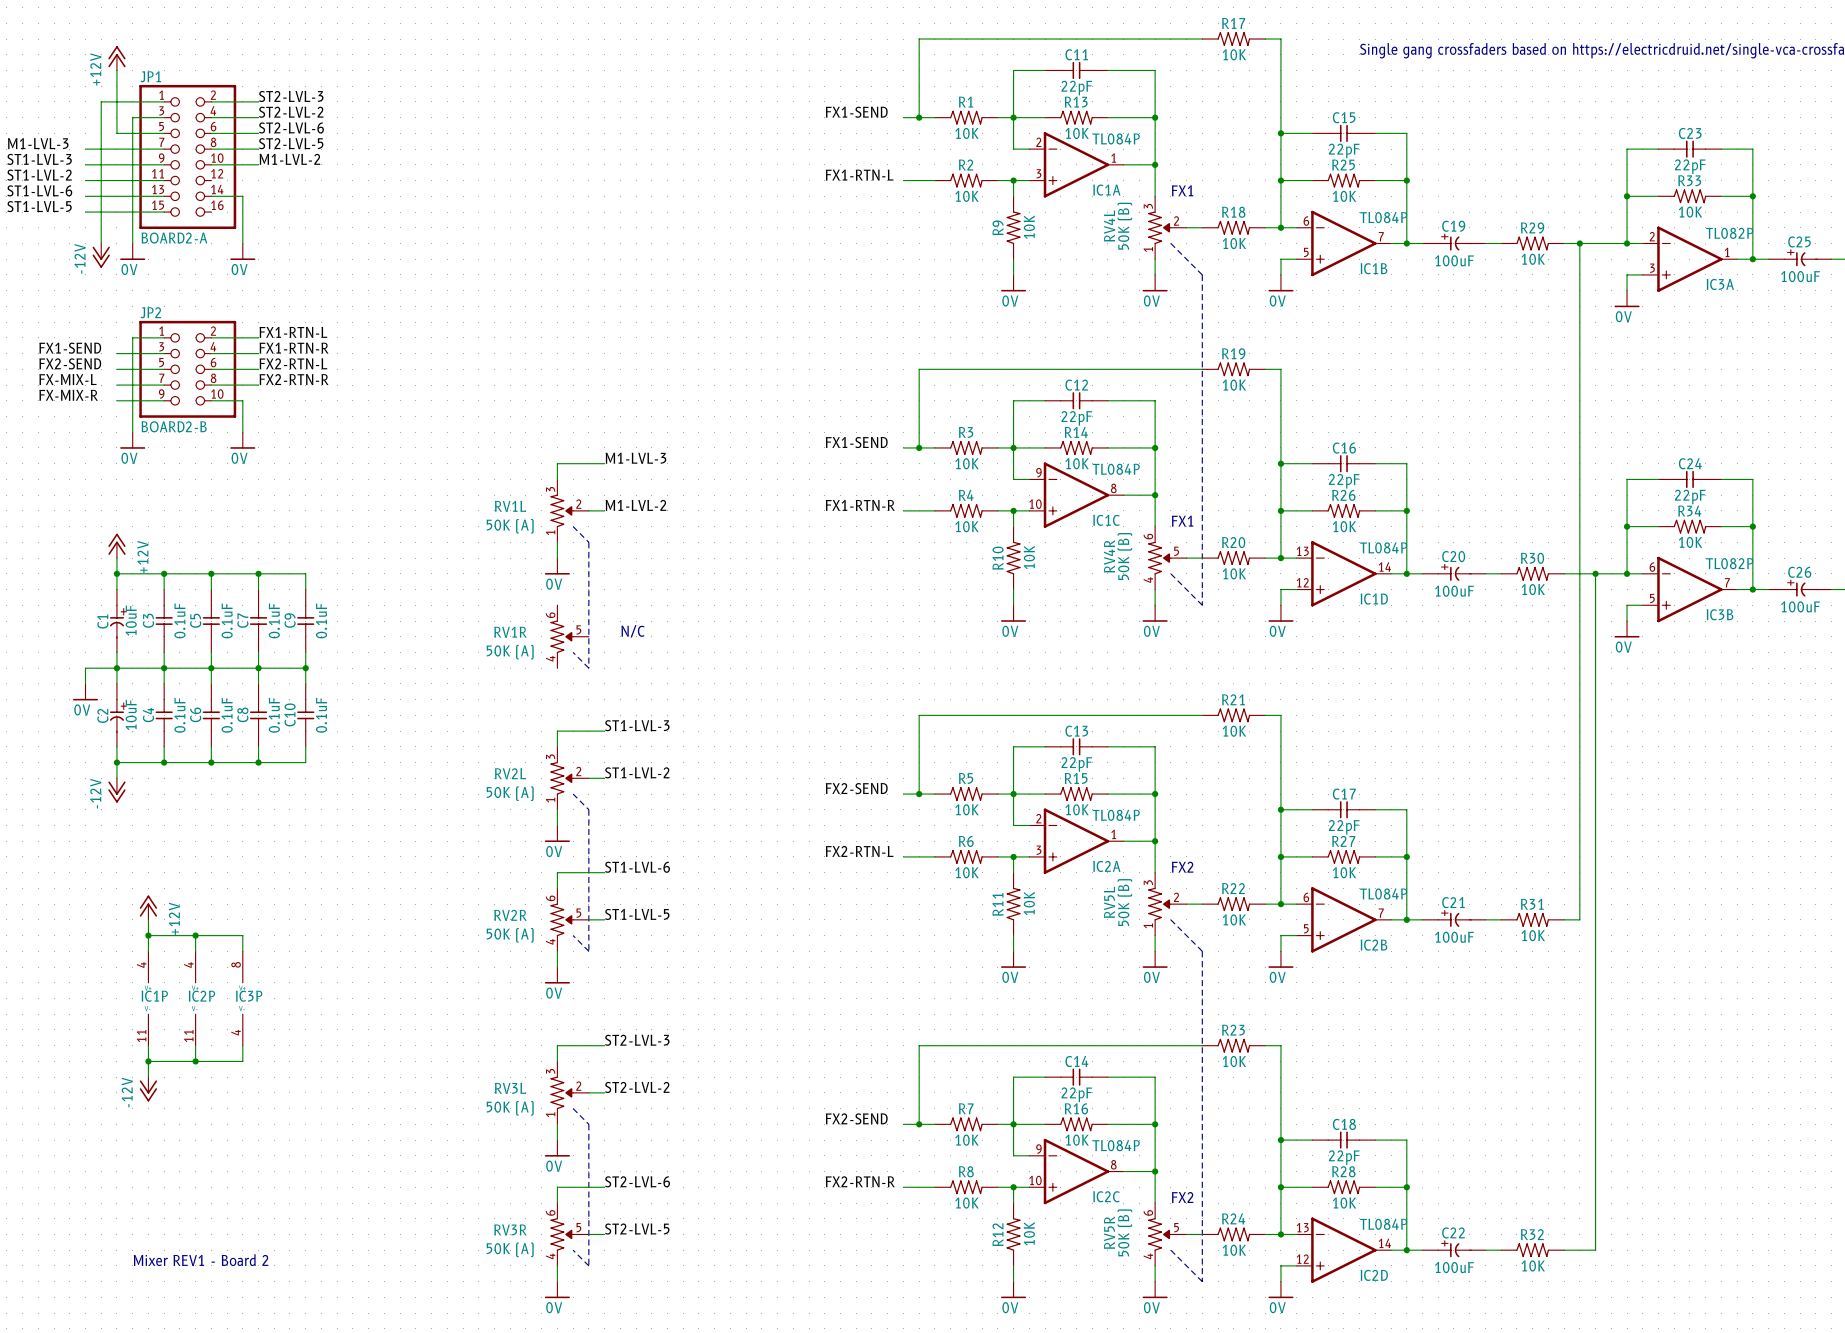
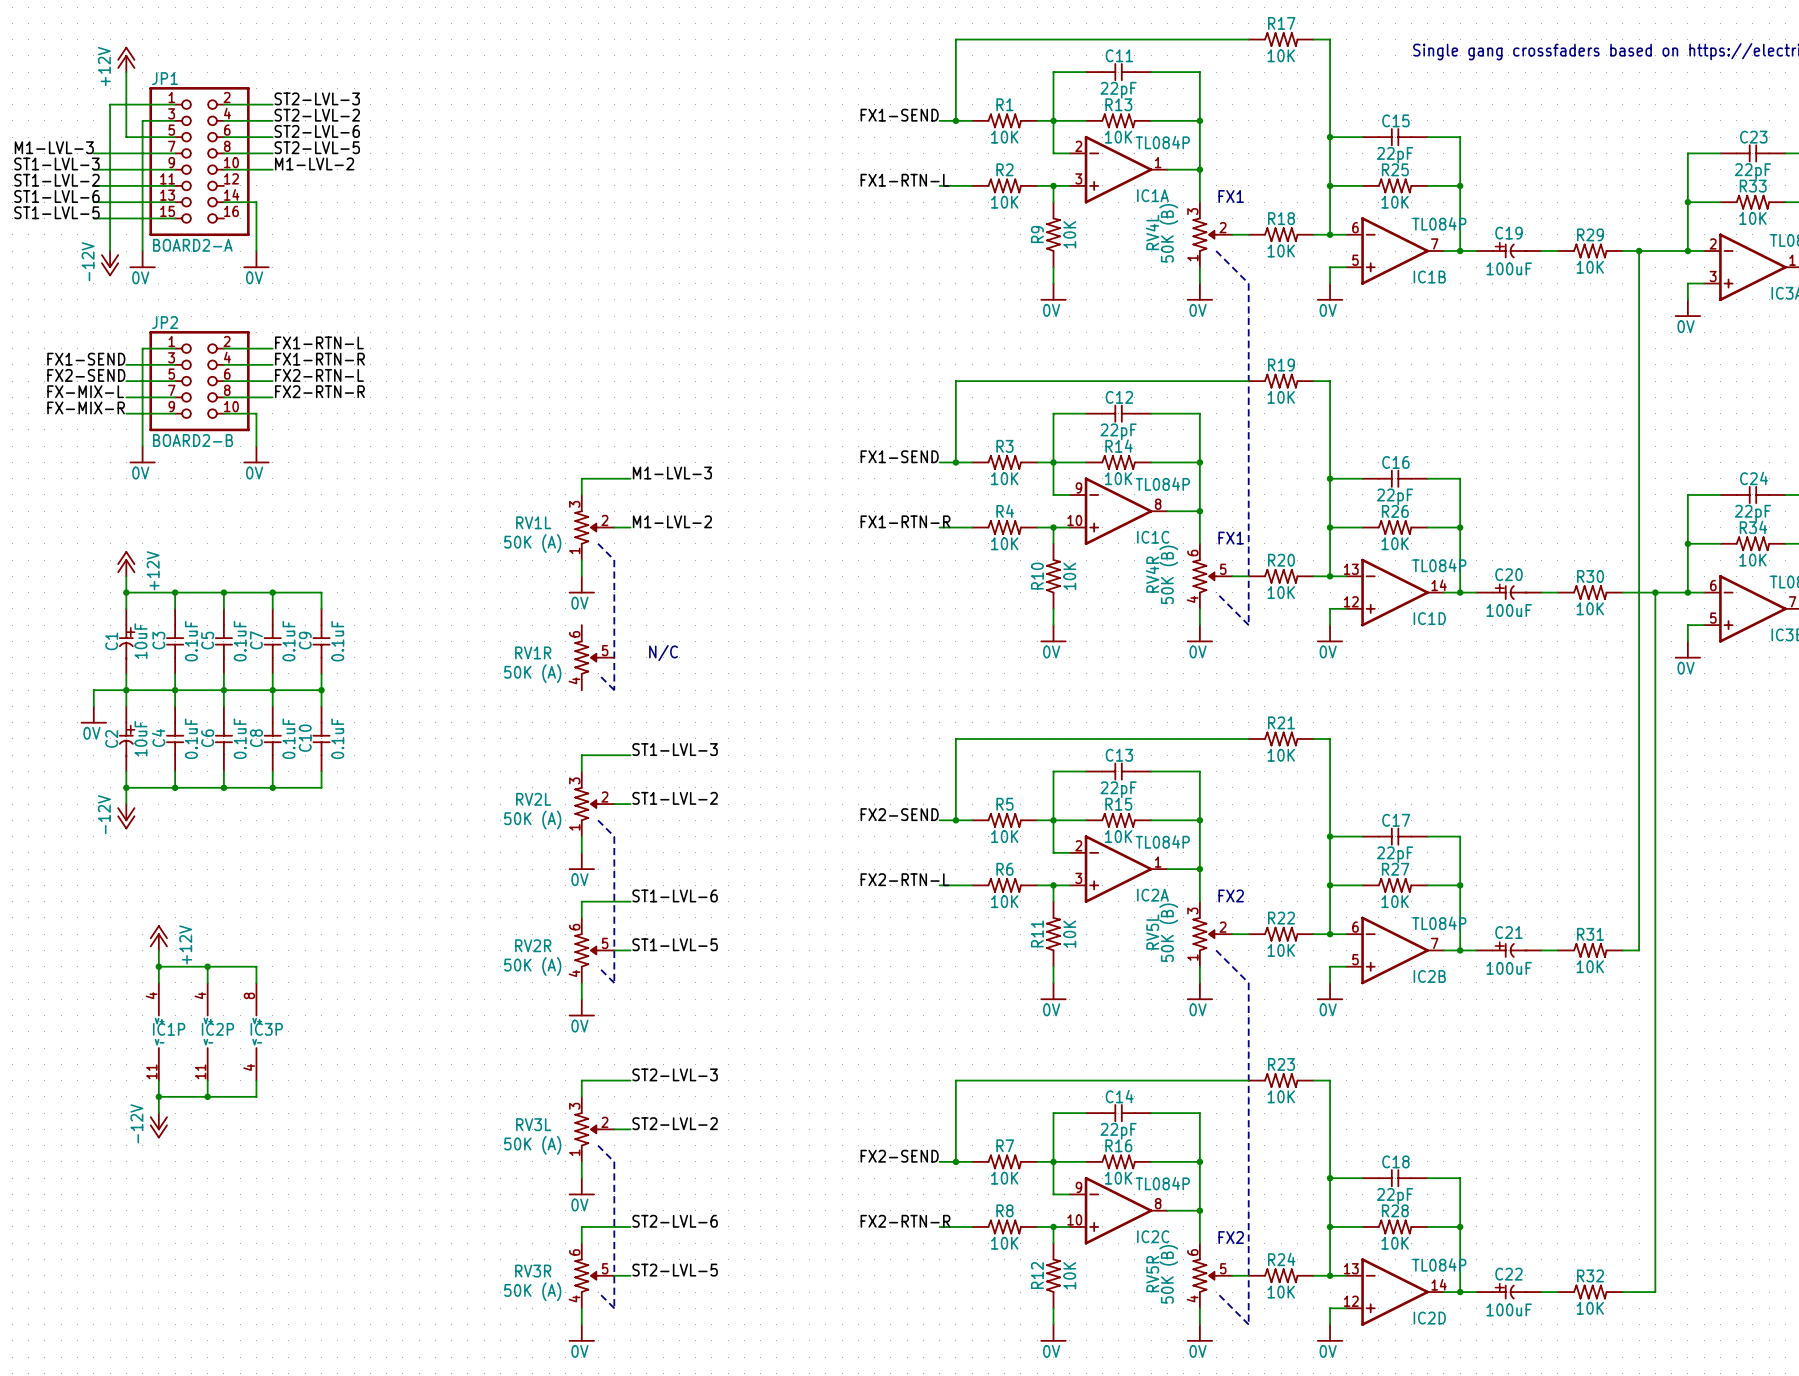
text: Mixer REV1 - Board 2 (201, 1260) -> none

